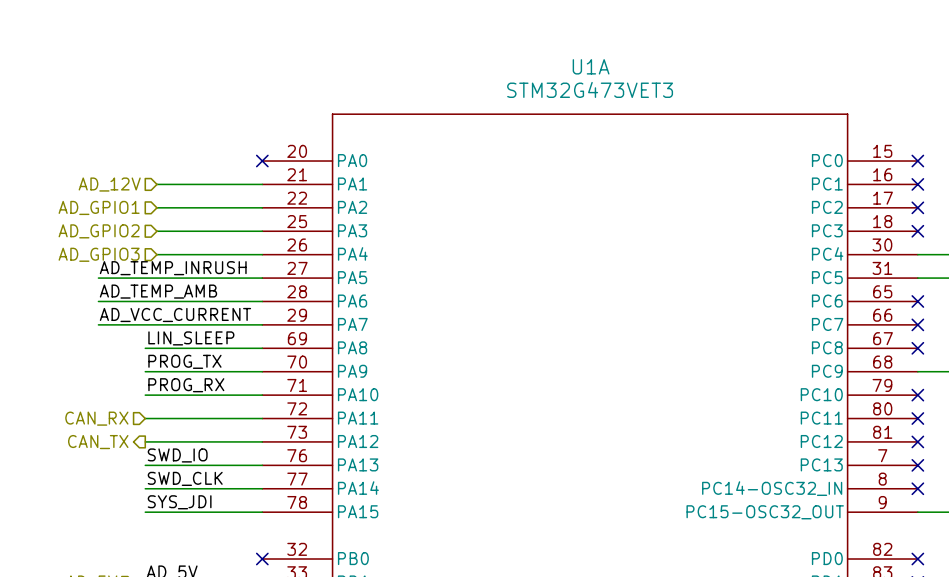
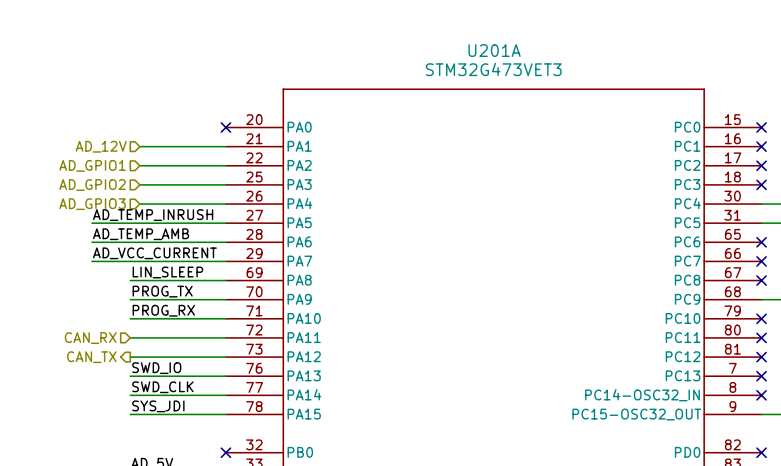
U1A name: U1A (591, 66) -> U201A (494, 50)

